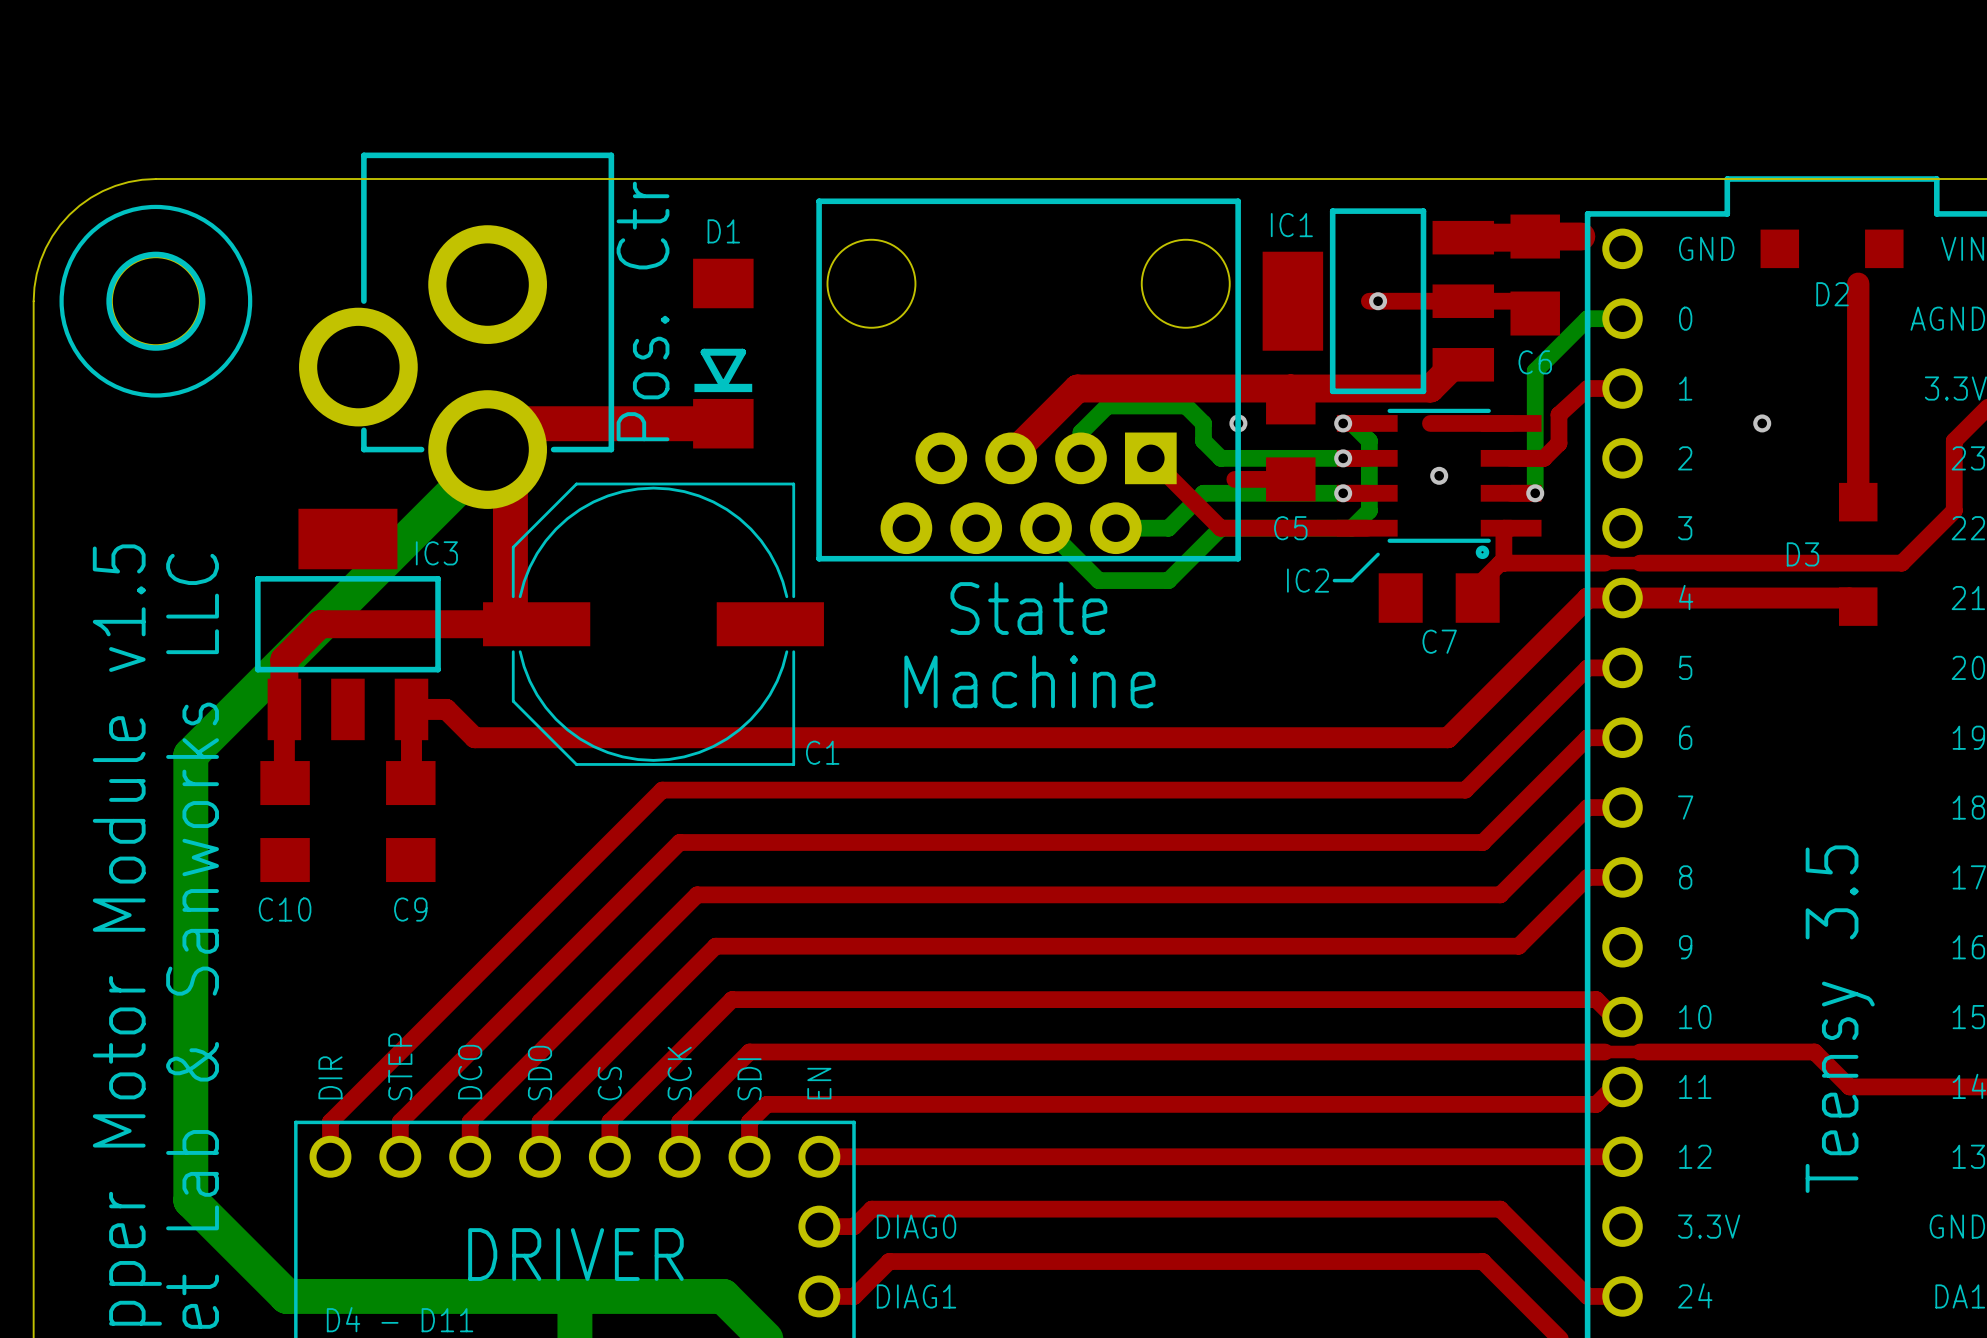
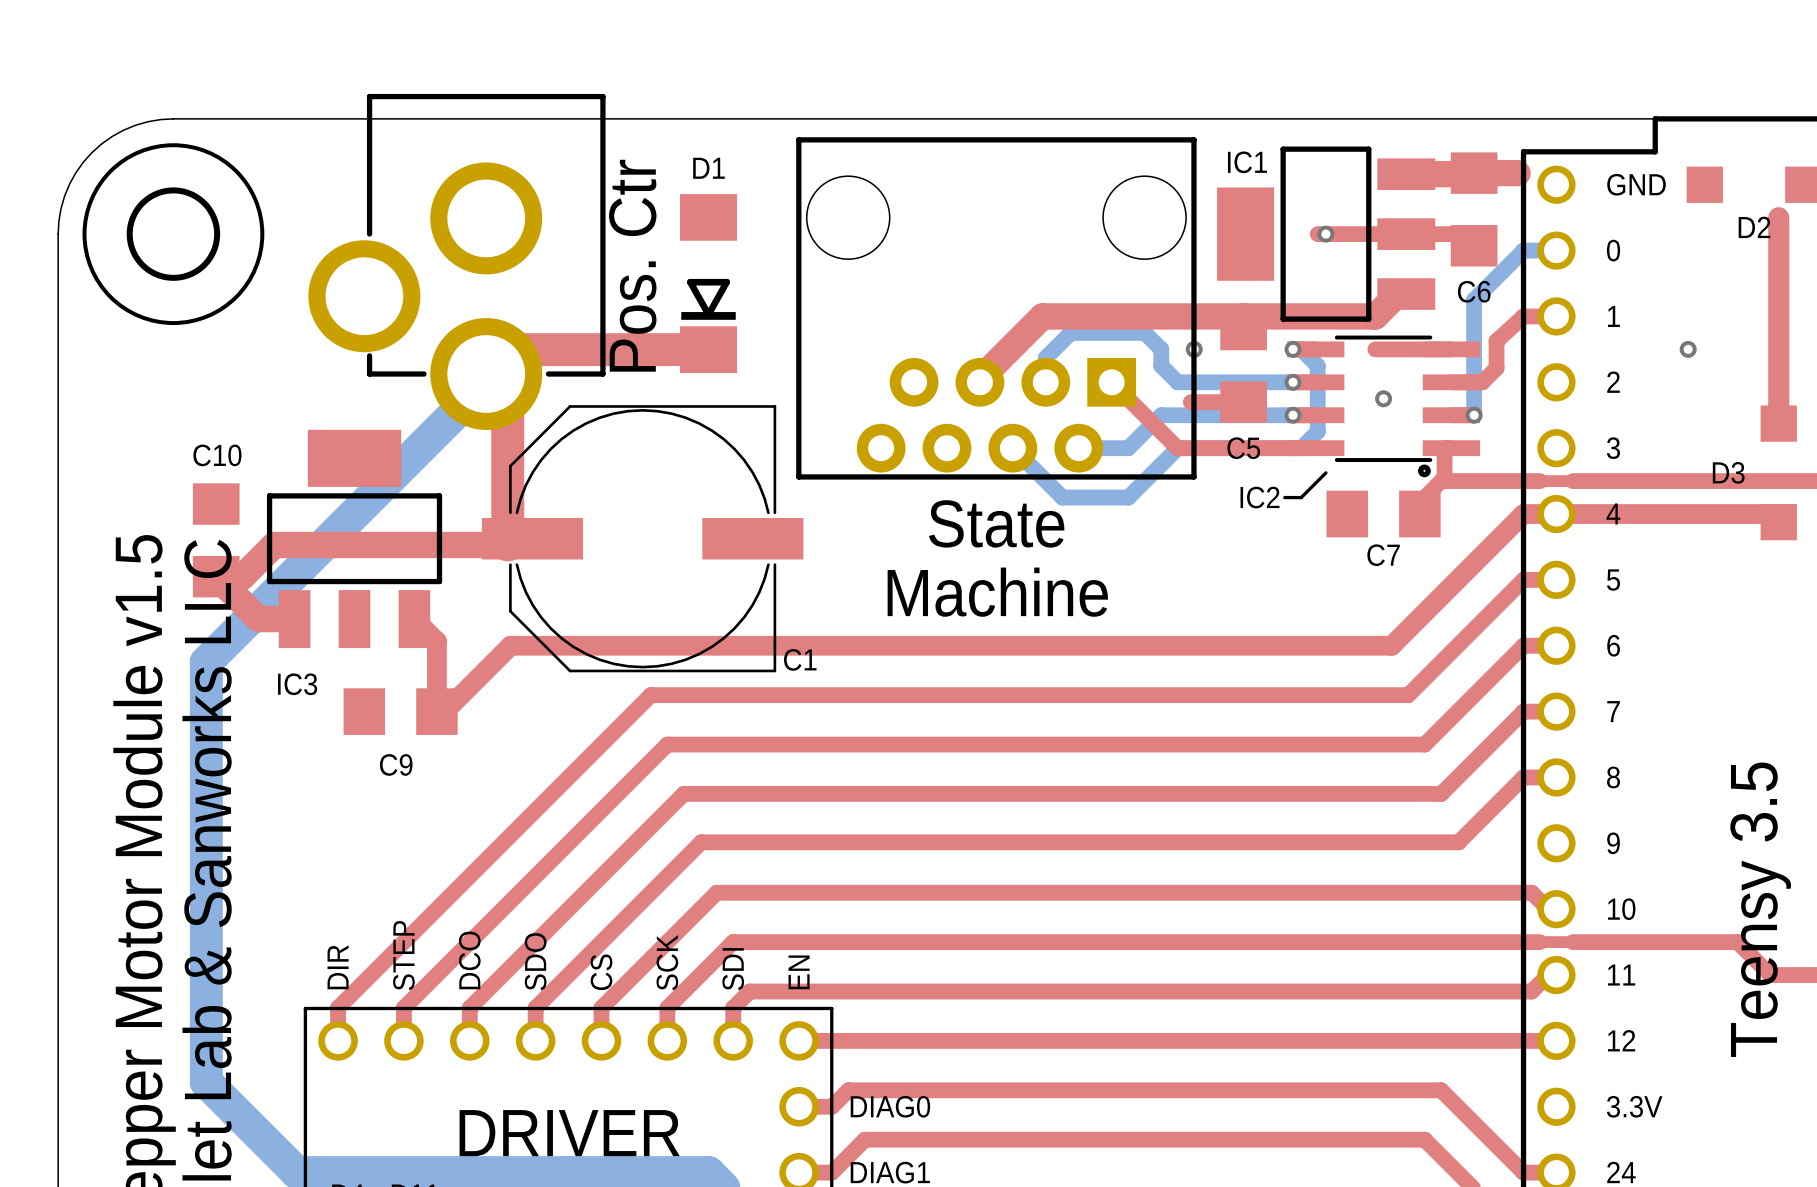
IC3 name position: IC3 (436, 553) -> IC3 (297, 684)
top track: (510, 624) (320, 624) (284, 659) (285, 783) -> (507, 538) (507, 544) (274, 544) (242, 576) (216, 576) (258, 619) (294, 619)
top track: (513, 737) (474, 737) (446, 709) (411, 709) (410, 783) -> (510, 645) (444, 711) (436, 711) (436, 641) (414, 619)
C10 position: (285, 821) -> (216, 540)
C9 rotation: 0° (410, 821) -> 90° clockwise (400, 711)
C10 name position: C10 (285, 909) -> C10 (217, 455)

